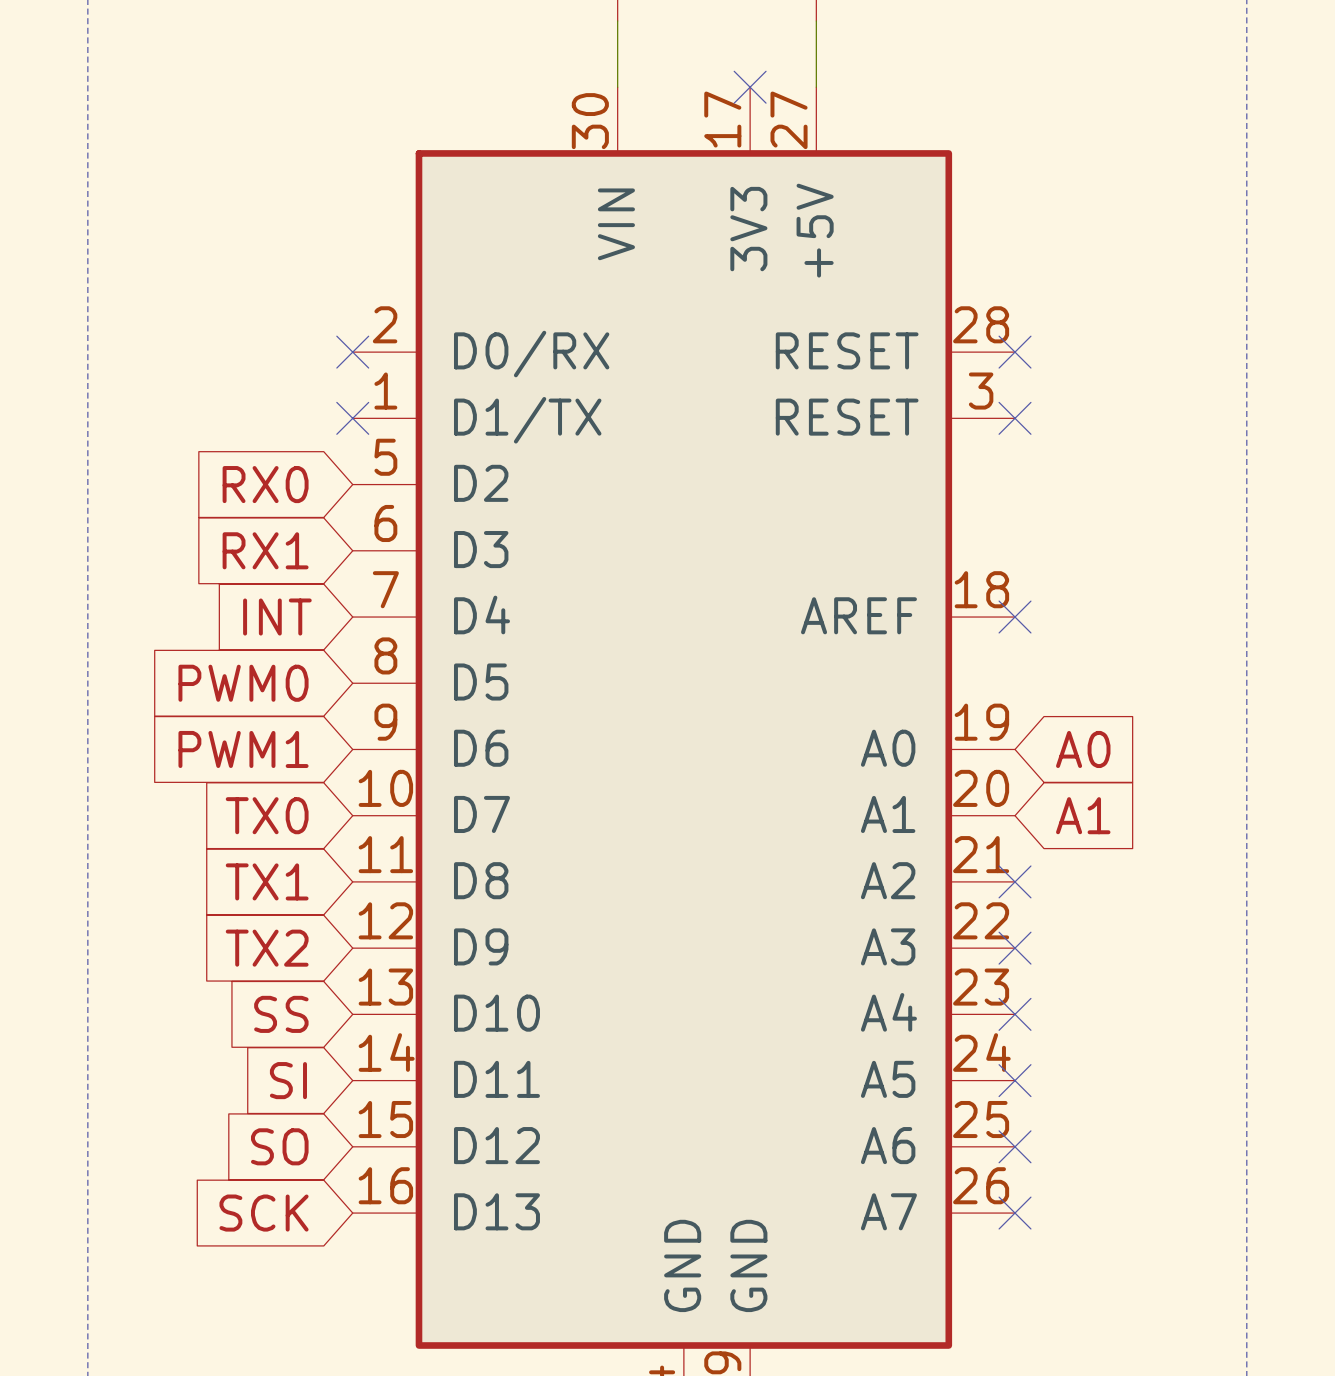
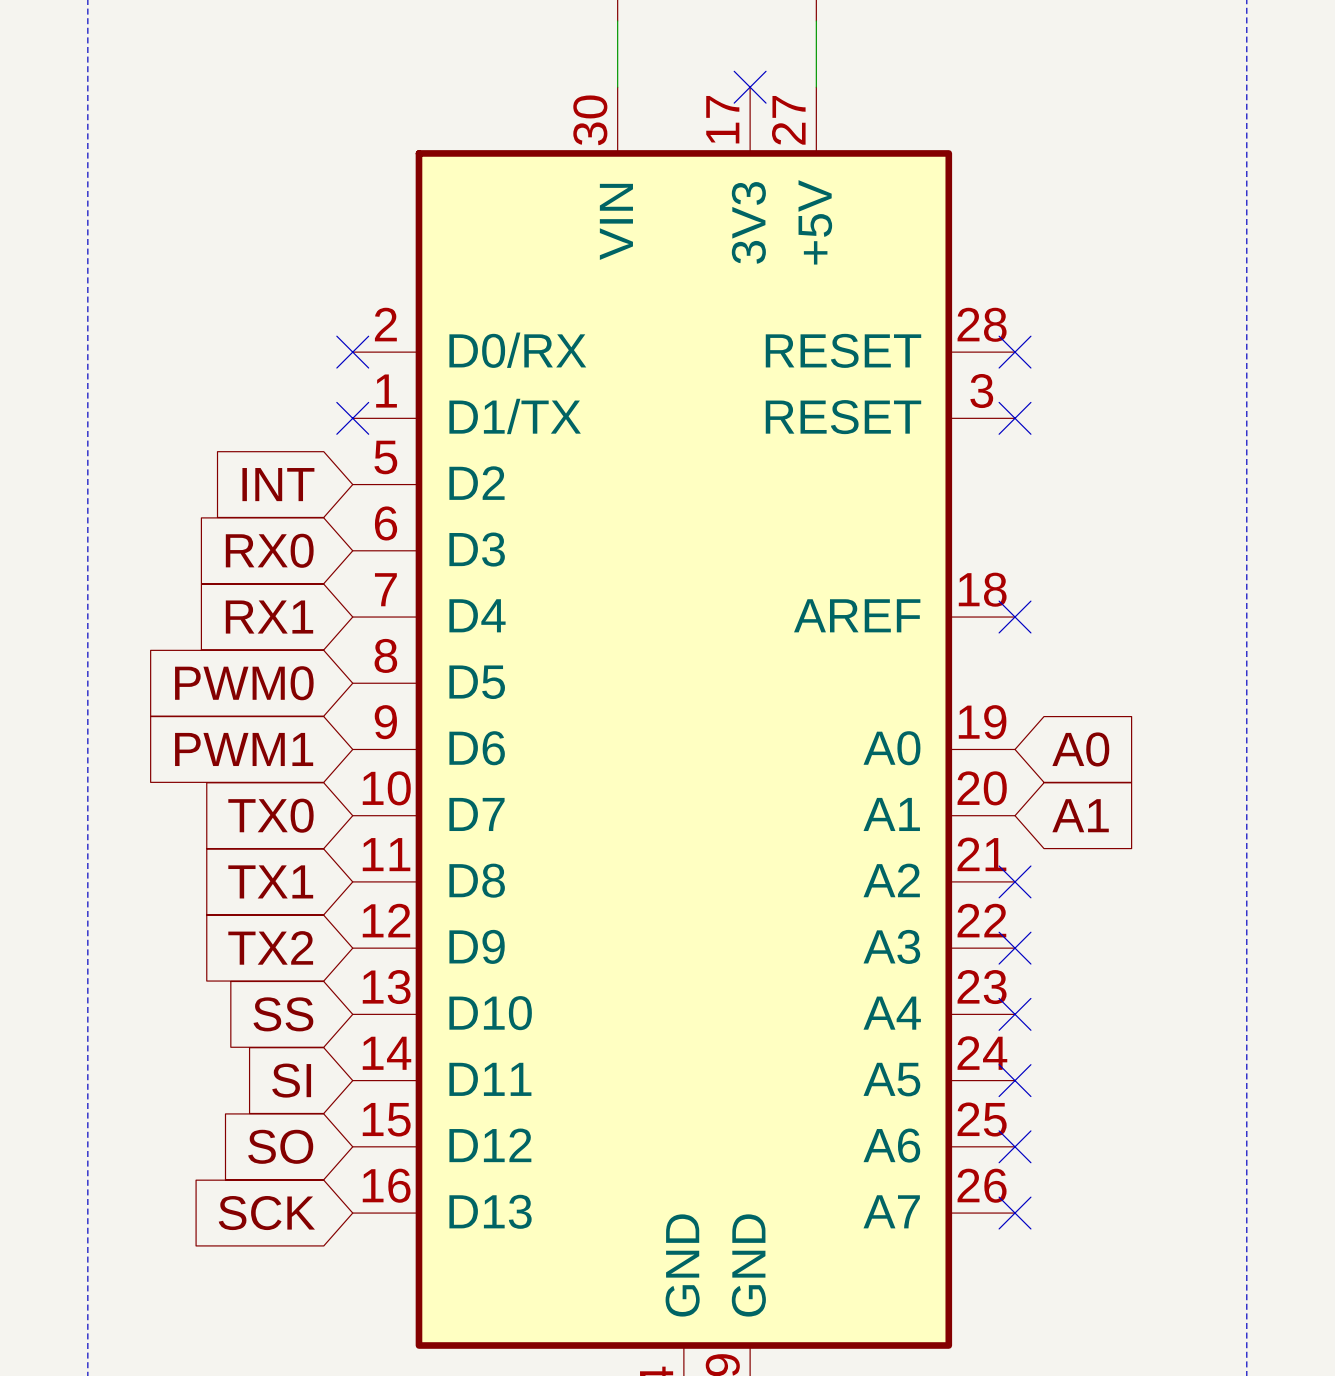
global label: RX0 (265, 484) -> INT (278, 484)
global label: RX1 (265, 550) -> RX0 (269, 550)
global label: INT (277, 617) -> RX1 (269, 617)

